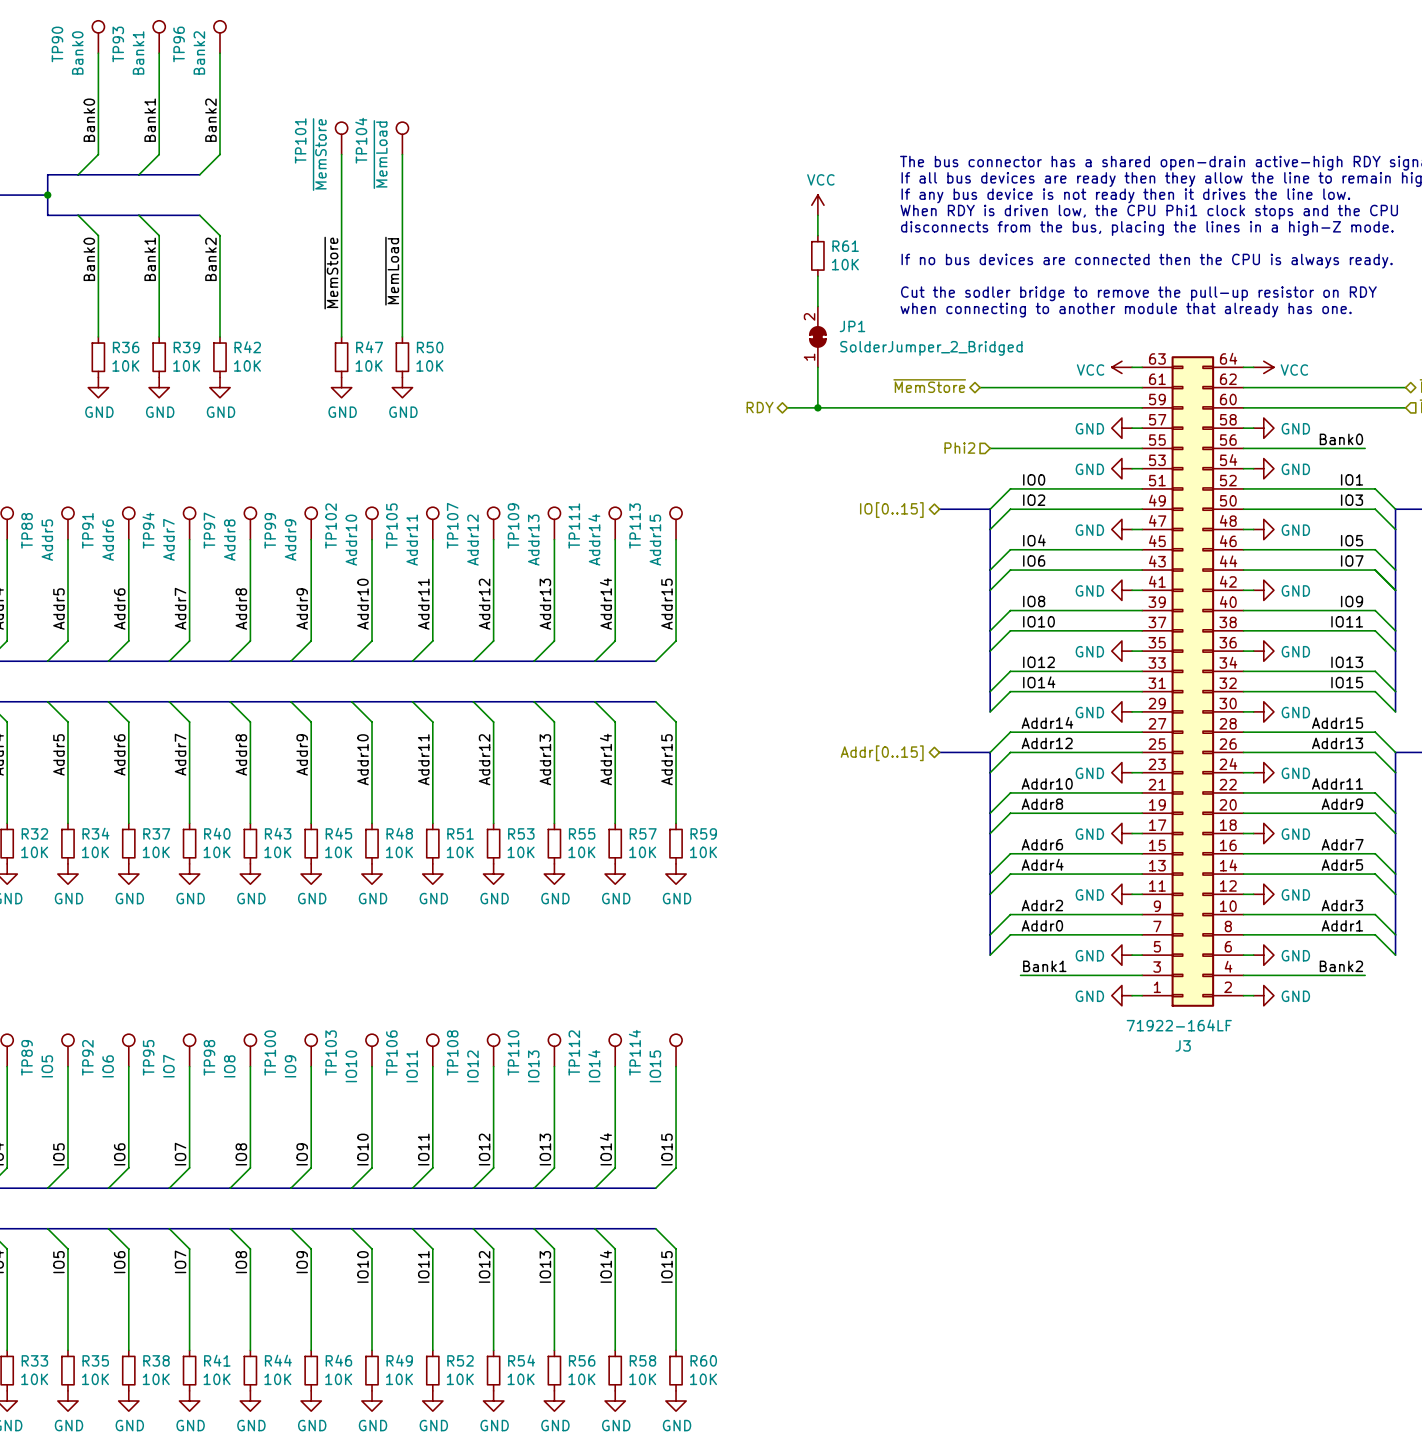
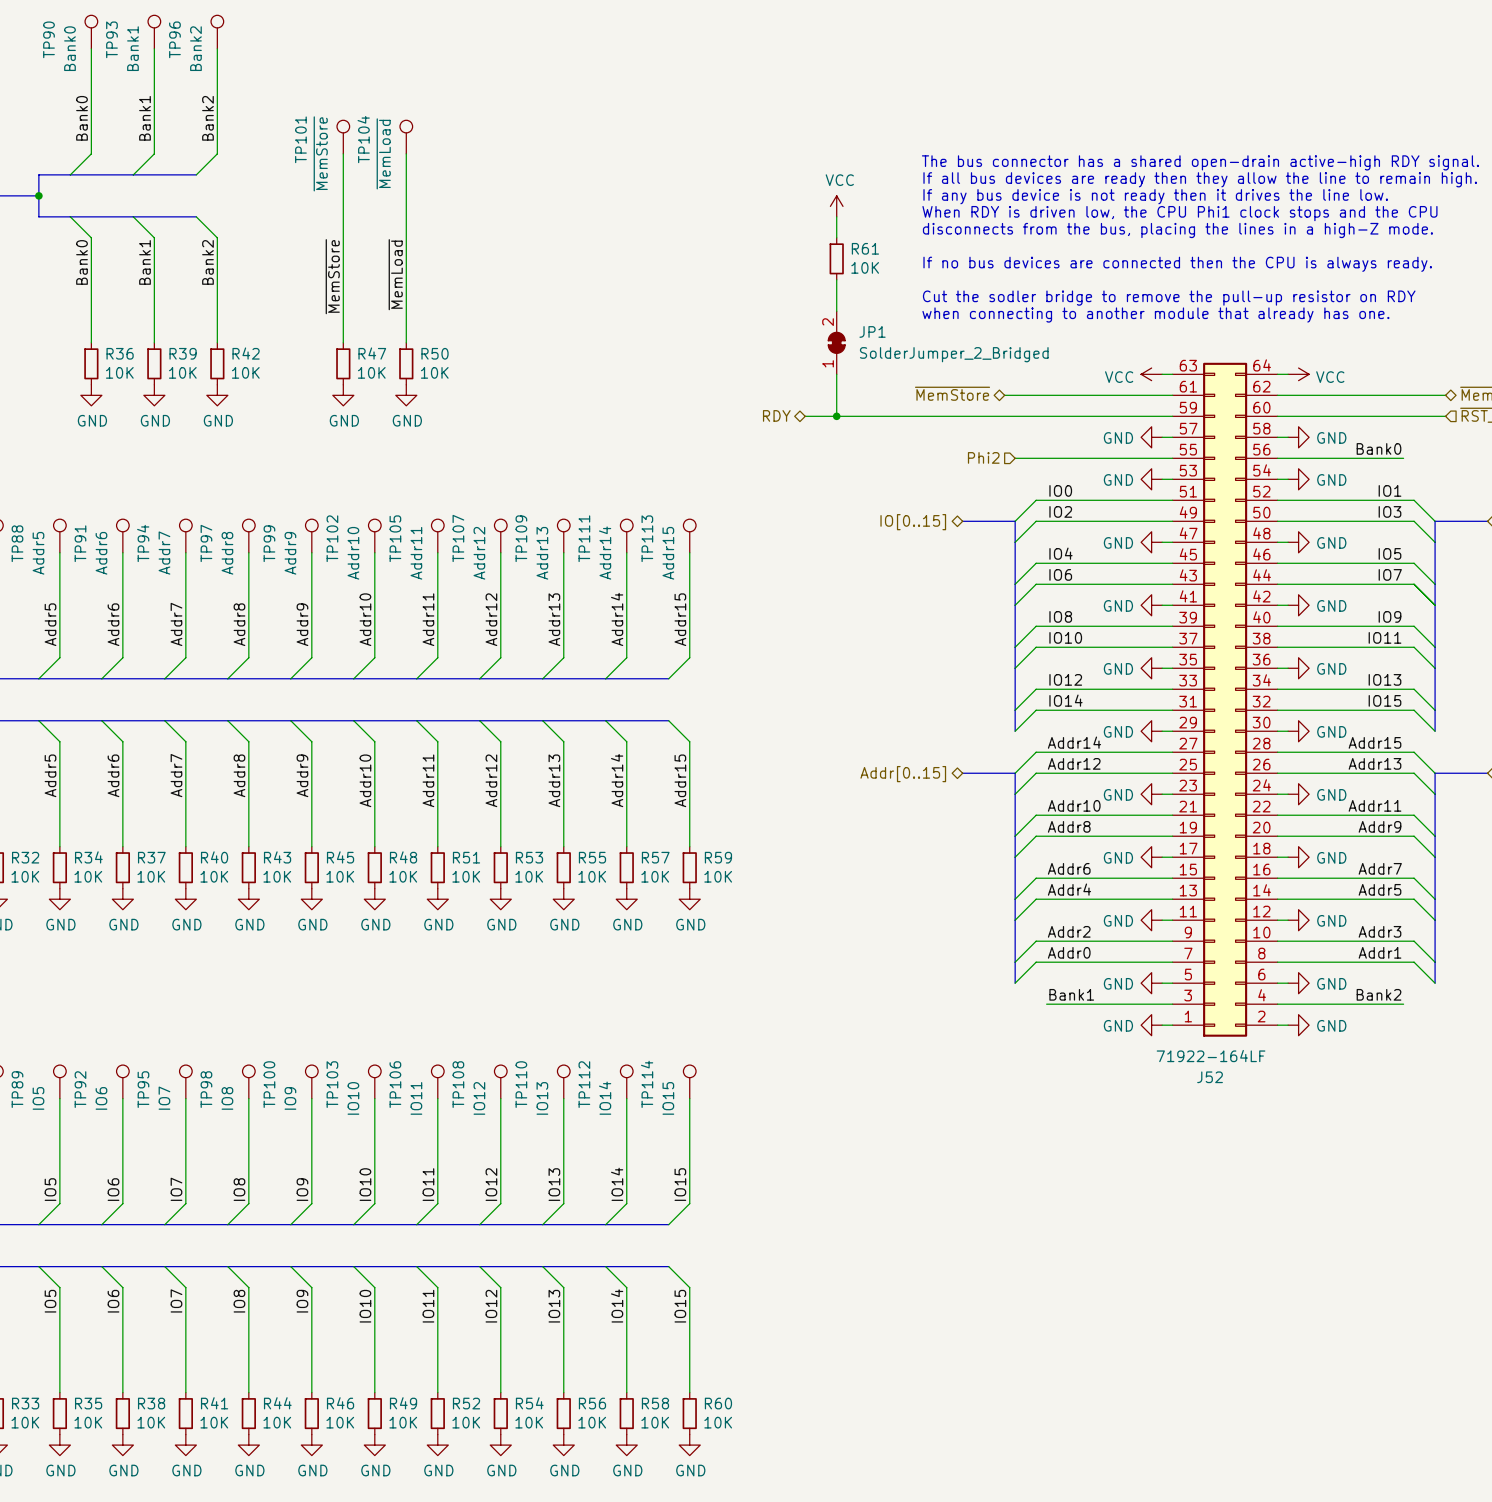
J3 name: J3 (1183, 1045) -> J52 (1210, 1077)

